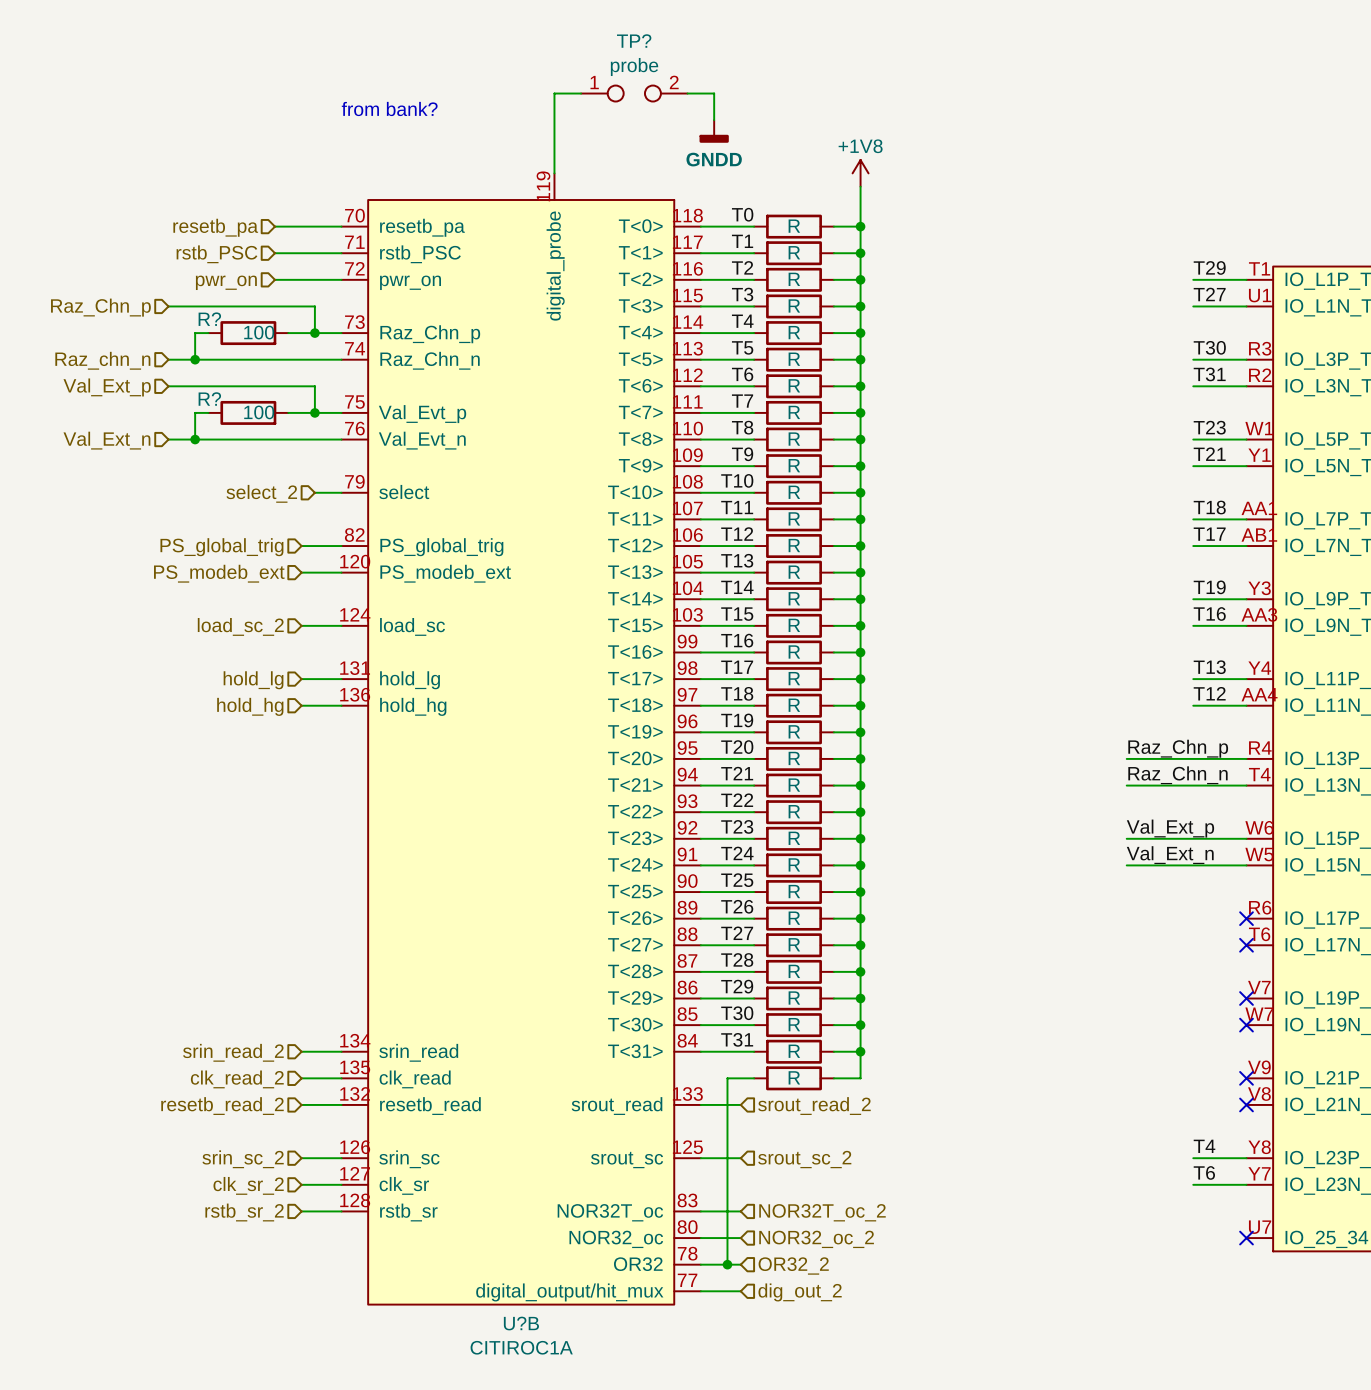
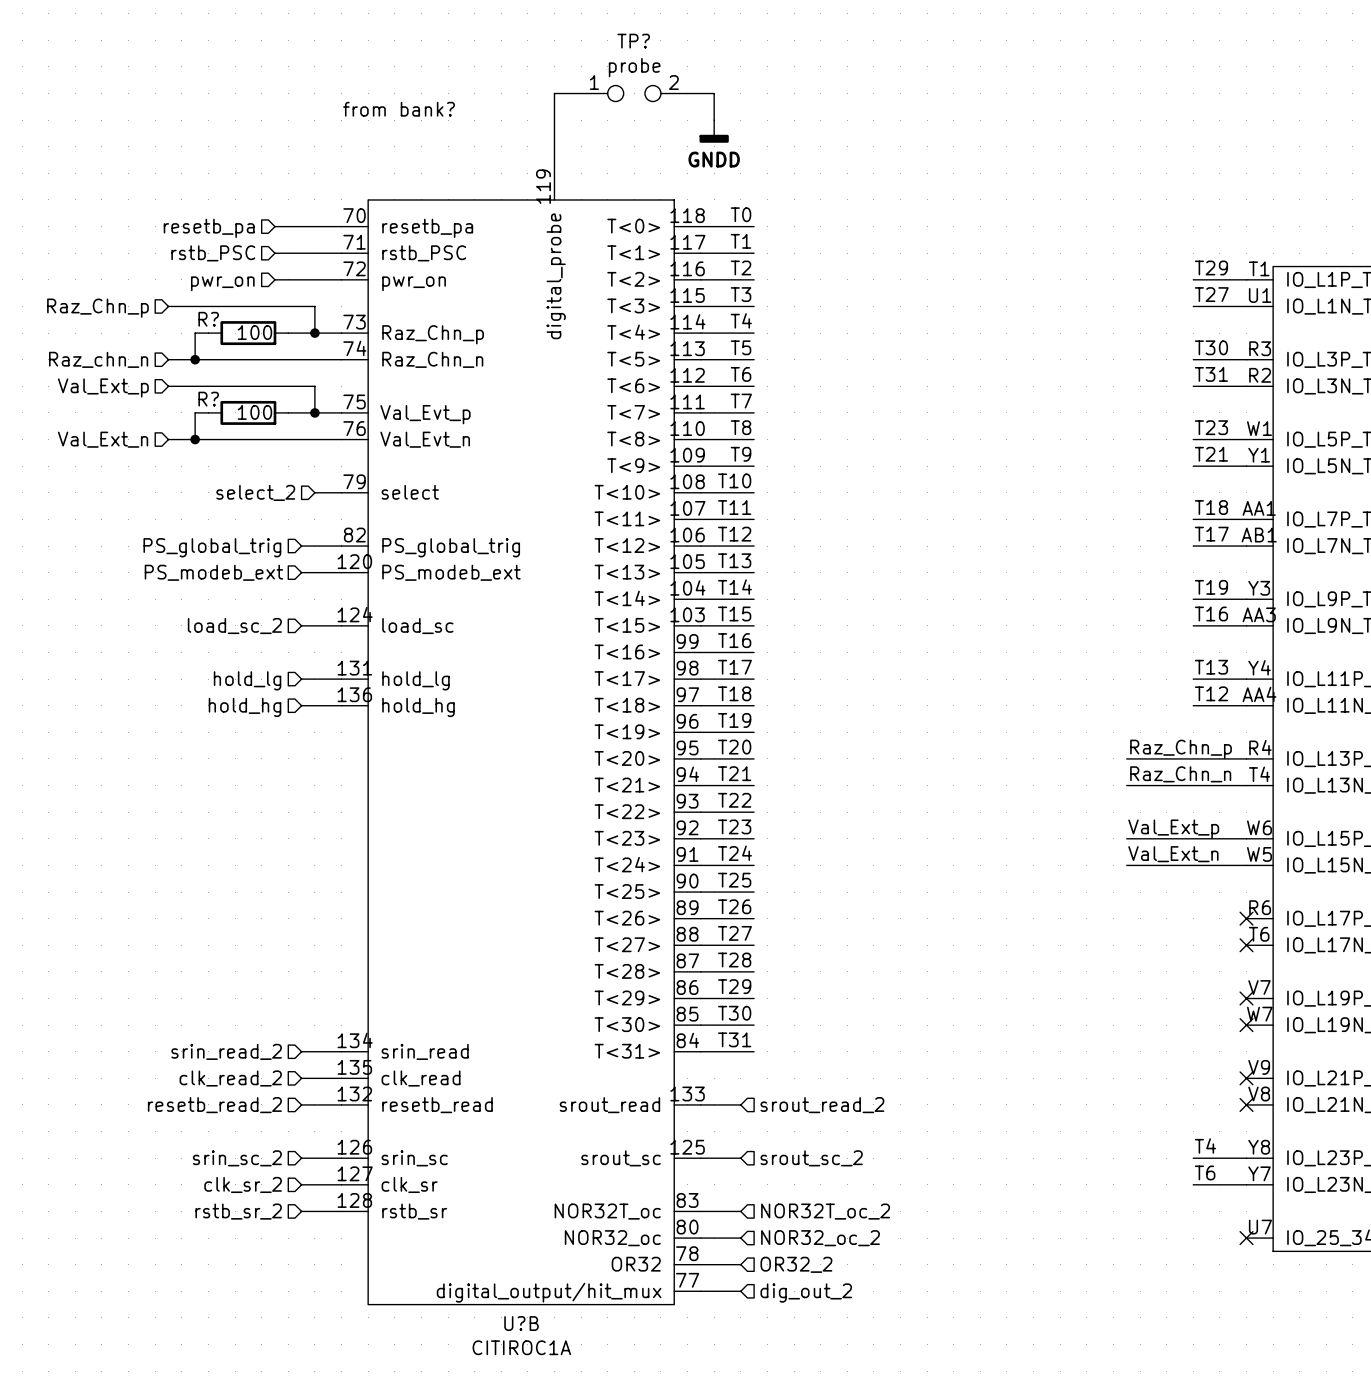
power symbol: +1V8 (860, 173) -> none
wire: (860, 186) (860, 1078) (833, 1078) -> none
part: R (794, 226) -> none
wire: (833, 226) (860, 226) -> none
junction: (860, 226) -> none
part: R (794, 253) -> none
wire: (833, 253) (860, 253) -> none
junction: (860, 253) -> none
part: R (794, 279) -> none
wire: (833, 279) (860, 279) -> none
junction: (860, 279) -> none
part: R (794, 306) -> none
wire: (833, 306) (860, 306) -> none
junction: (860, 306) -> none
part: R (794, 333) -> none
wire: (833, 333) (860, 333) -> none
junction: (860, 333) -> none
part: R (794, 359) -> none
wire: (833, 359) (860, 359) -> none
junction: (860, 359) -> none
part: R (794, 386) -> none
wire: (833, 386) (860, 386) -> none
junction: (860, 386) -> none
part: R (794, 412) -> none
wire: (833, 412) (860, 412) -> none
junction: (860, 412) -> none
part: R (794, 439) -> none
wire: (833, 439) (860, 439) -> none
junction: (860, 439) -> none
part: R (794, 466) -> none
wire: (833, 466) (860, 466) -> none
junction: (860, 466) -> none
part: R (794, 492) -> none
wire: (833, 492) (860, 492) -> none
junction: (860, 492) -> none
part: R (794, 519) -> none
wire: (833, 519) (860, 519) -> none
junction: (860, 519) -> none
part: R (794, 546) -> none
wire: (833, 546) (860, 546) -> none
junction: (860, 546) -> none
part: R (794, 572) -> none
wire: (833, 572) (860, 572) -> none
junction: (860, 572) -> none
part: R (794, 599) -> none
wire: (833, 599) (860, 599) -> none
junction: (860, 599) -> none
part: R (794, 625) -> none
wire: (833, 625) (860, 625) -> none
junction: (860, 625) -> none
part: R (794, 652) -> none
wire: (833, 652) (860, 652) -> none
junction: (860, 652) -> none
part: R (794, 679) -> none
wire: (833, 679) (860, 679) -> none
junction: (860, 679) -> none
part: R (794, 705) -> none
wire: (833, 705) (860, 705) -> none
junction: (860, 705) -> none
part: R (794, 732) -> none
wire: (833, 732) (860, 732) -> none
junction: (860, 732) -> none
part: R (794, 758) -> none
wire: (833, 758) (860, 758) -> none
junction: (860, 758) -> none
part: R (794, 785) -> none
wire: (833, 785) (860, 785) -> none
junction: (860, 785) -> none
part: R (794, 812) -> none
wire: (833, 812) (860, 812) -> none
junction: (860, 812) -> none
part: R (794, 838) -> none
wire: (833, 838) (860, 838) -> none
junction: (860, 838) -> none
part: R (794, 865) -> none
wire: (833, 865) (860, 865) -> none
junction: (860, 865) -> none
part: R (794, 892) -> none
wire: (833, 892) (860, 892) -> none
junction: (860, 892) -> none
part: R (794, 918) -> none
wire: (833, 918) (860, 918) -> none
junction: (860, 918) -> none
part: R (794, 945) -> none
wire: (833, 945) (860, 945) -> none
junction: (860, 945) -> none
part: R (794, 971) -> none
wire: (833, 971) (860, 971) -> none
junction: (860, 971) -> none
part: R (794, 998) -> none
wire: (833, 998) (860, 998) -> none
junction: (860, 998) -> none
part: R (794, 1025) -> none
wire: (833, 1025) (860, 1025) -> none
junction: (860, 1025) -> none
part: R (794, 1051) -> none
wire: (833, 1051) (860, 1051) -> none
junction: (860, 1051) -> none
wire: (754, 1078) (727, 1078) (727, 1264) -> none
part: R (794, 1078) -> none
junction: (727, 1264) -> none

